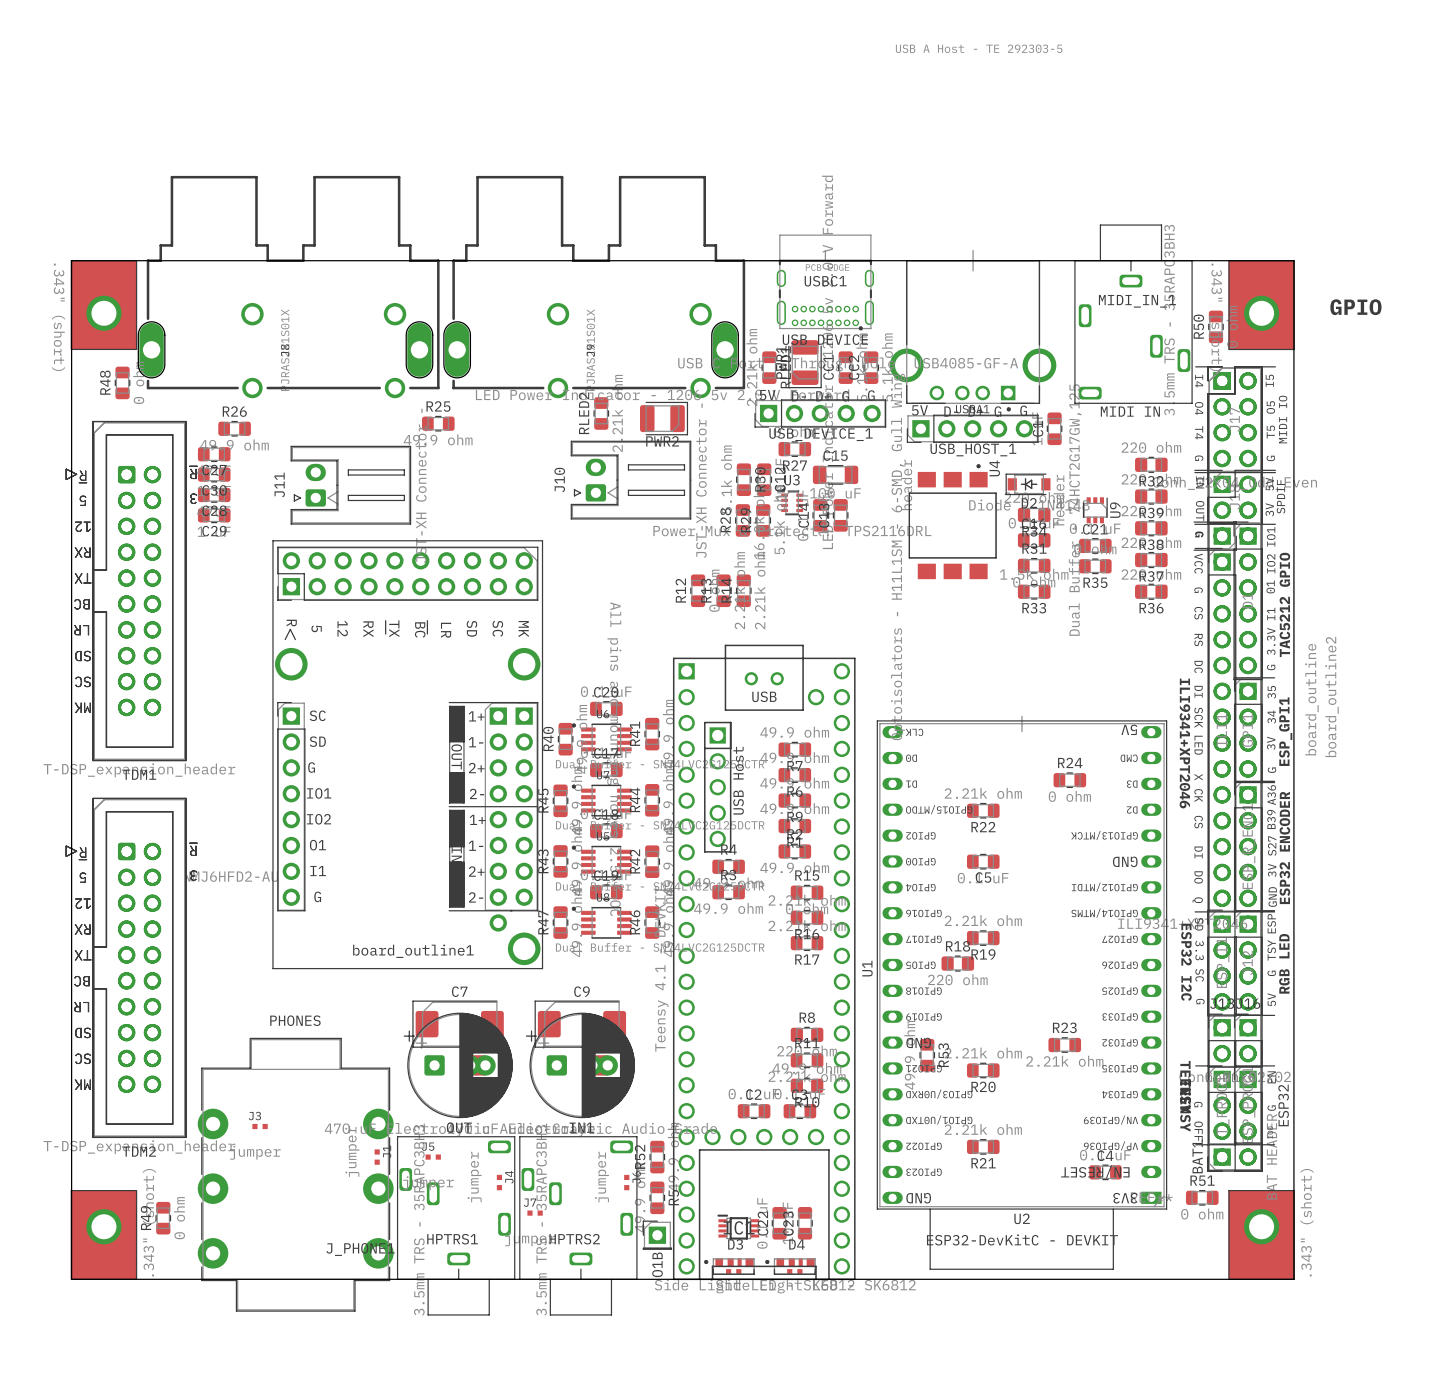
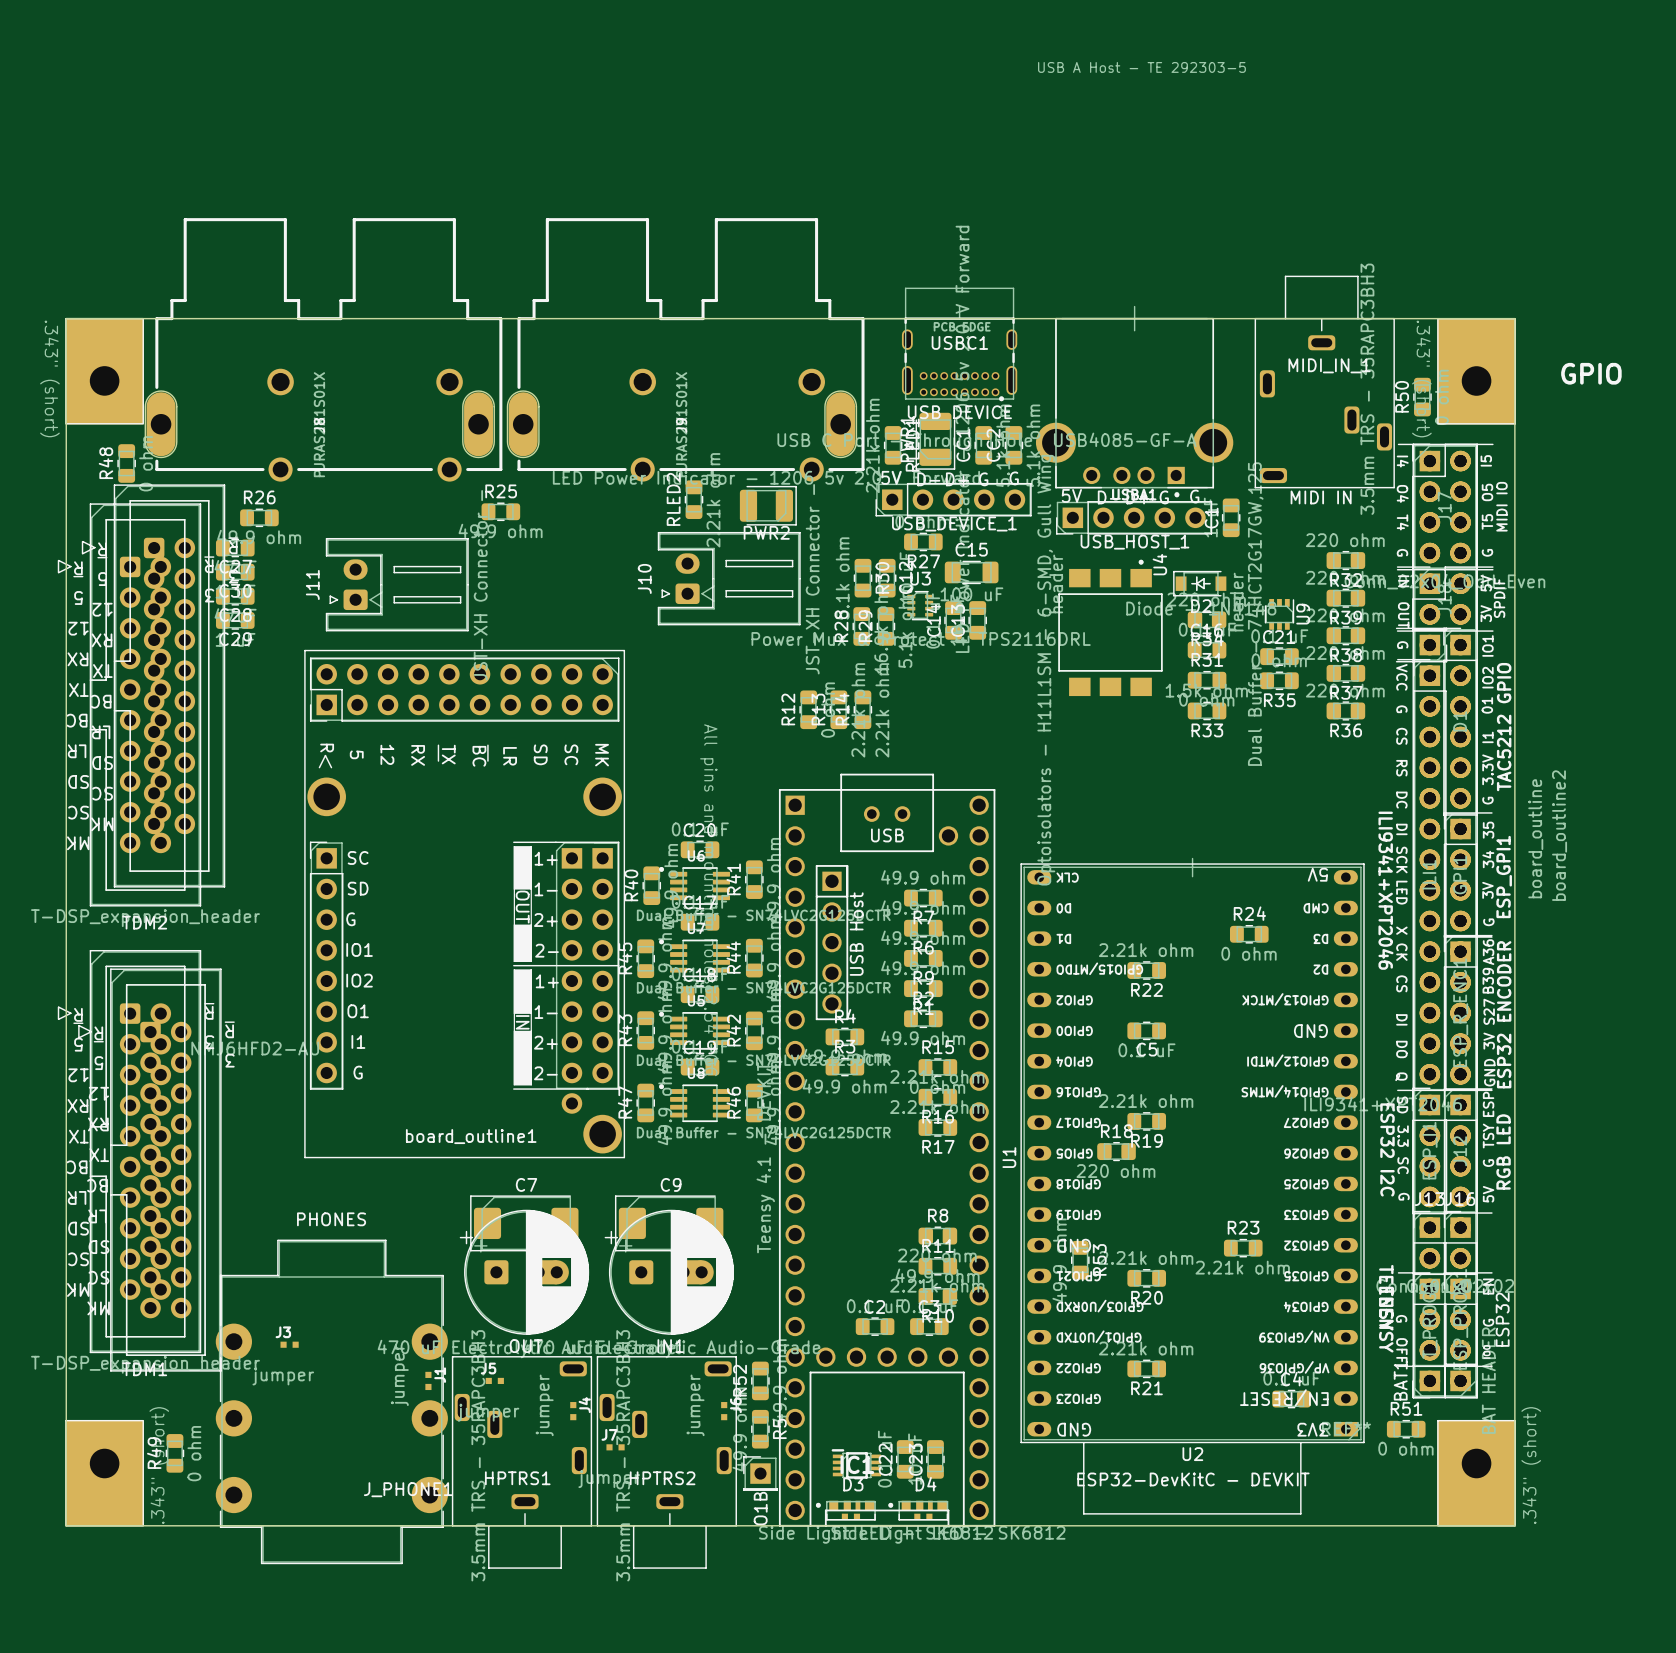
board_outline2 footprint: [65, 260, 1295, 1280] -> [65, 317, 1516, 1527]
TDM1 position: (131, 591) -> (136, 1151)
TDM2 position: (131, 967) -> (136, 704)

